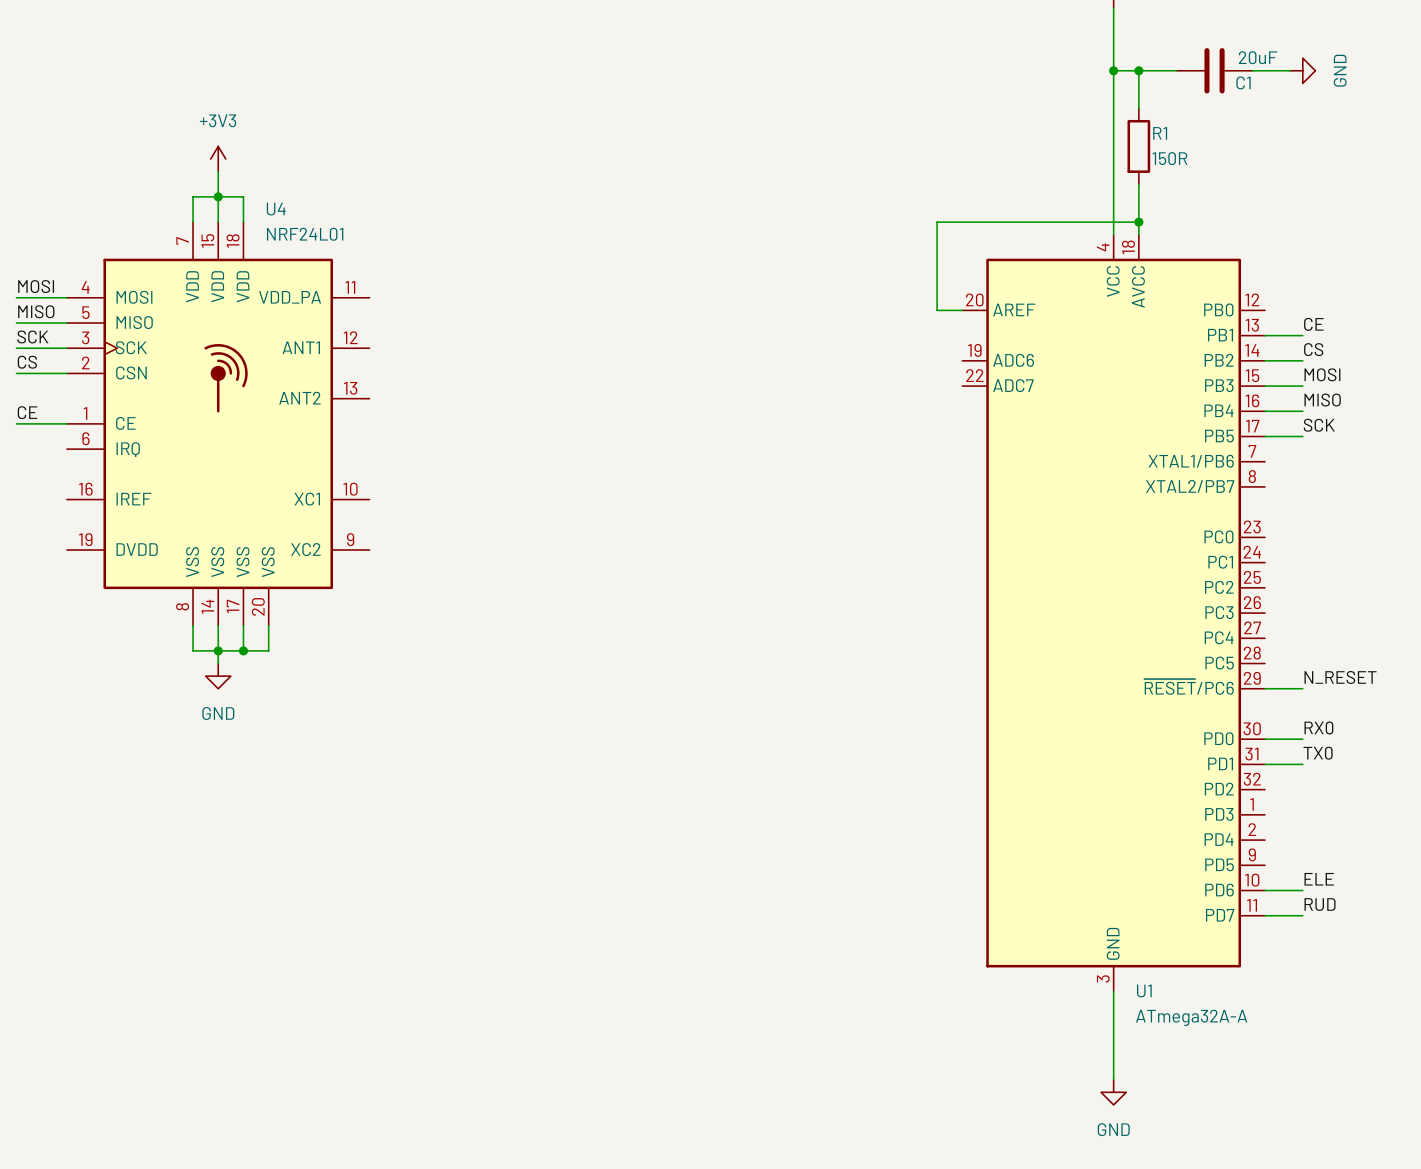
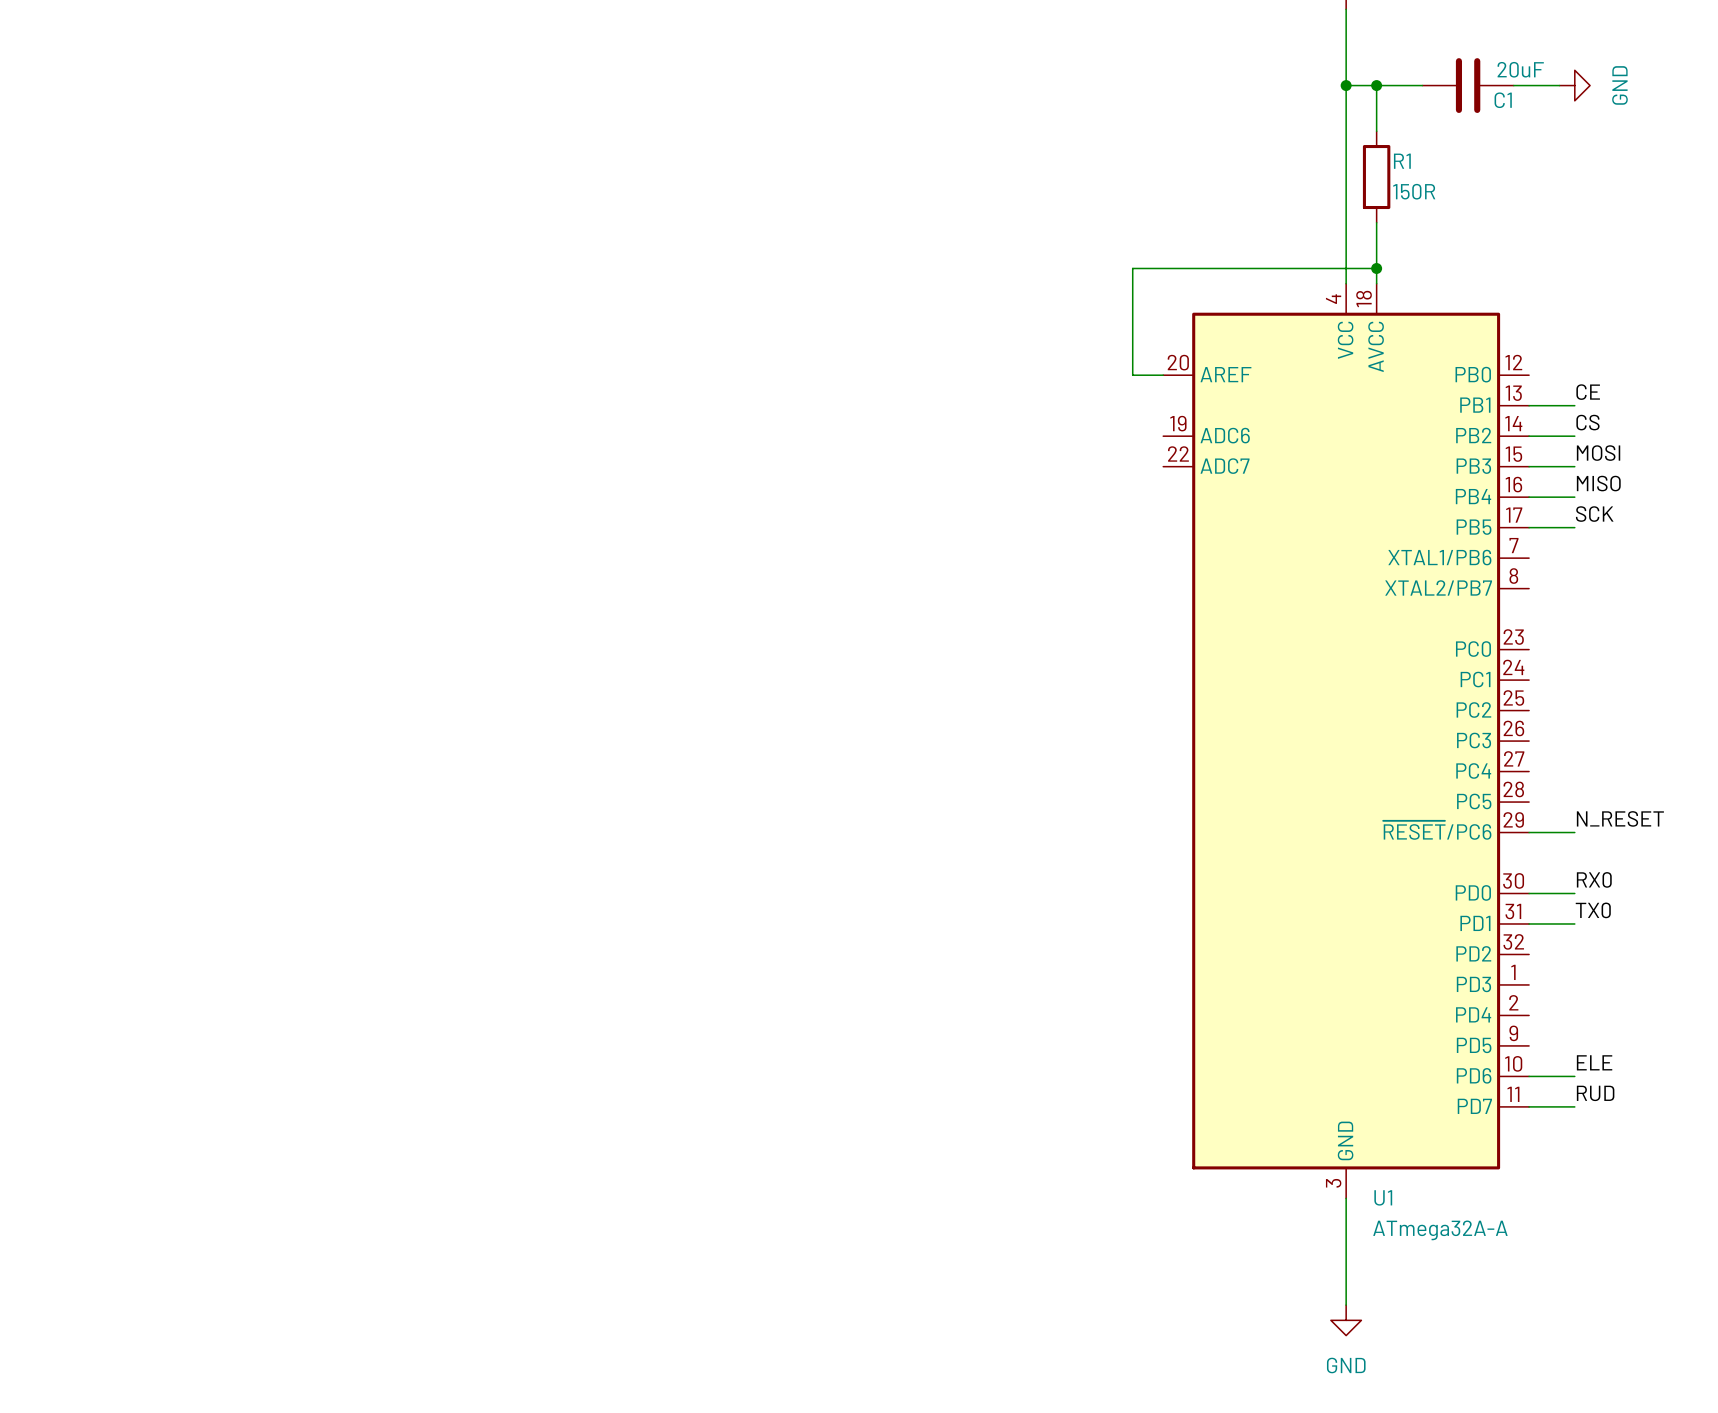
power symbol: +3V3 (218, 159) -> none
wire: (218, 171) (218, 222) -> none
junction: (218, 196) -> none
wire: (193, 222) (193, 196) (243, 196) (243, 222) -> none
label: MOSI (36, 286) -> none
wire: (16, 297) (66, 297) -> none
label: MISO (36, 311) -> none
wire: (16, 323) (66, 323) -> none
label: SCK (32, 336) -> none
wire: (16, 348) (66, 348) -> none
label: CS (27, 362) -> none
wire: (16, 373) (66, 373) -> none
label: CE (27, 412) -> none
wire: (16, 423) (66, 423) -> none
U4: NRF24L01 (218, 423) -> none
wire: (193, 625) (193, 650) (268, 650) (268, 625) -> none
wire: (218, 625) (218, 663) -> none
wire: (243, 625) (243, 650) -> none
junction: (218, 650) -> none
junction: (243, 650) -> none
power symbol: GND (218, 676) -> none

